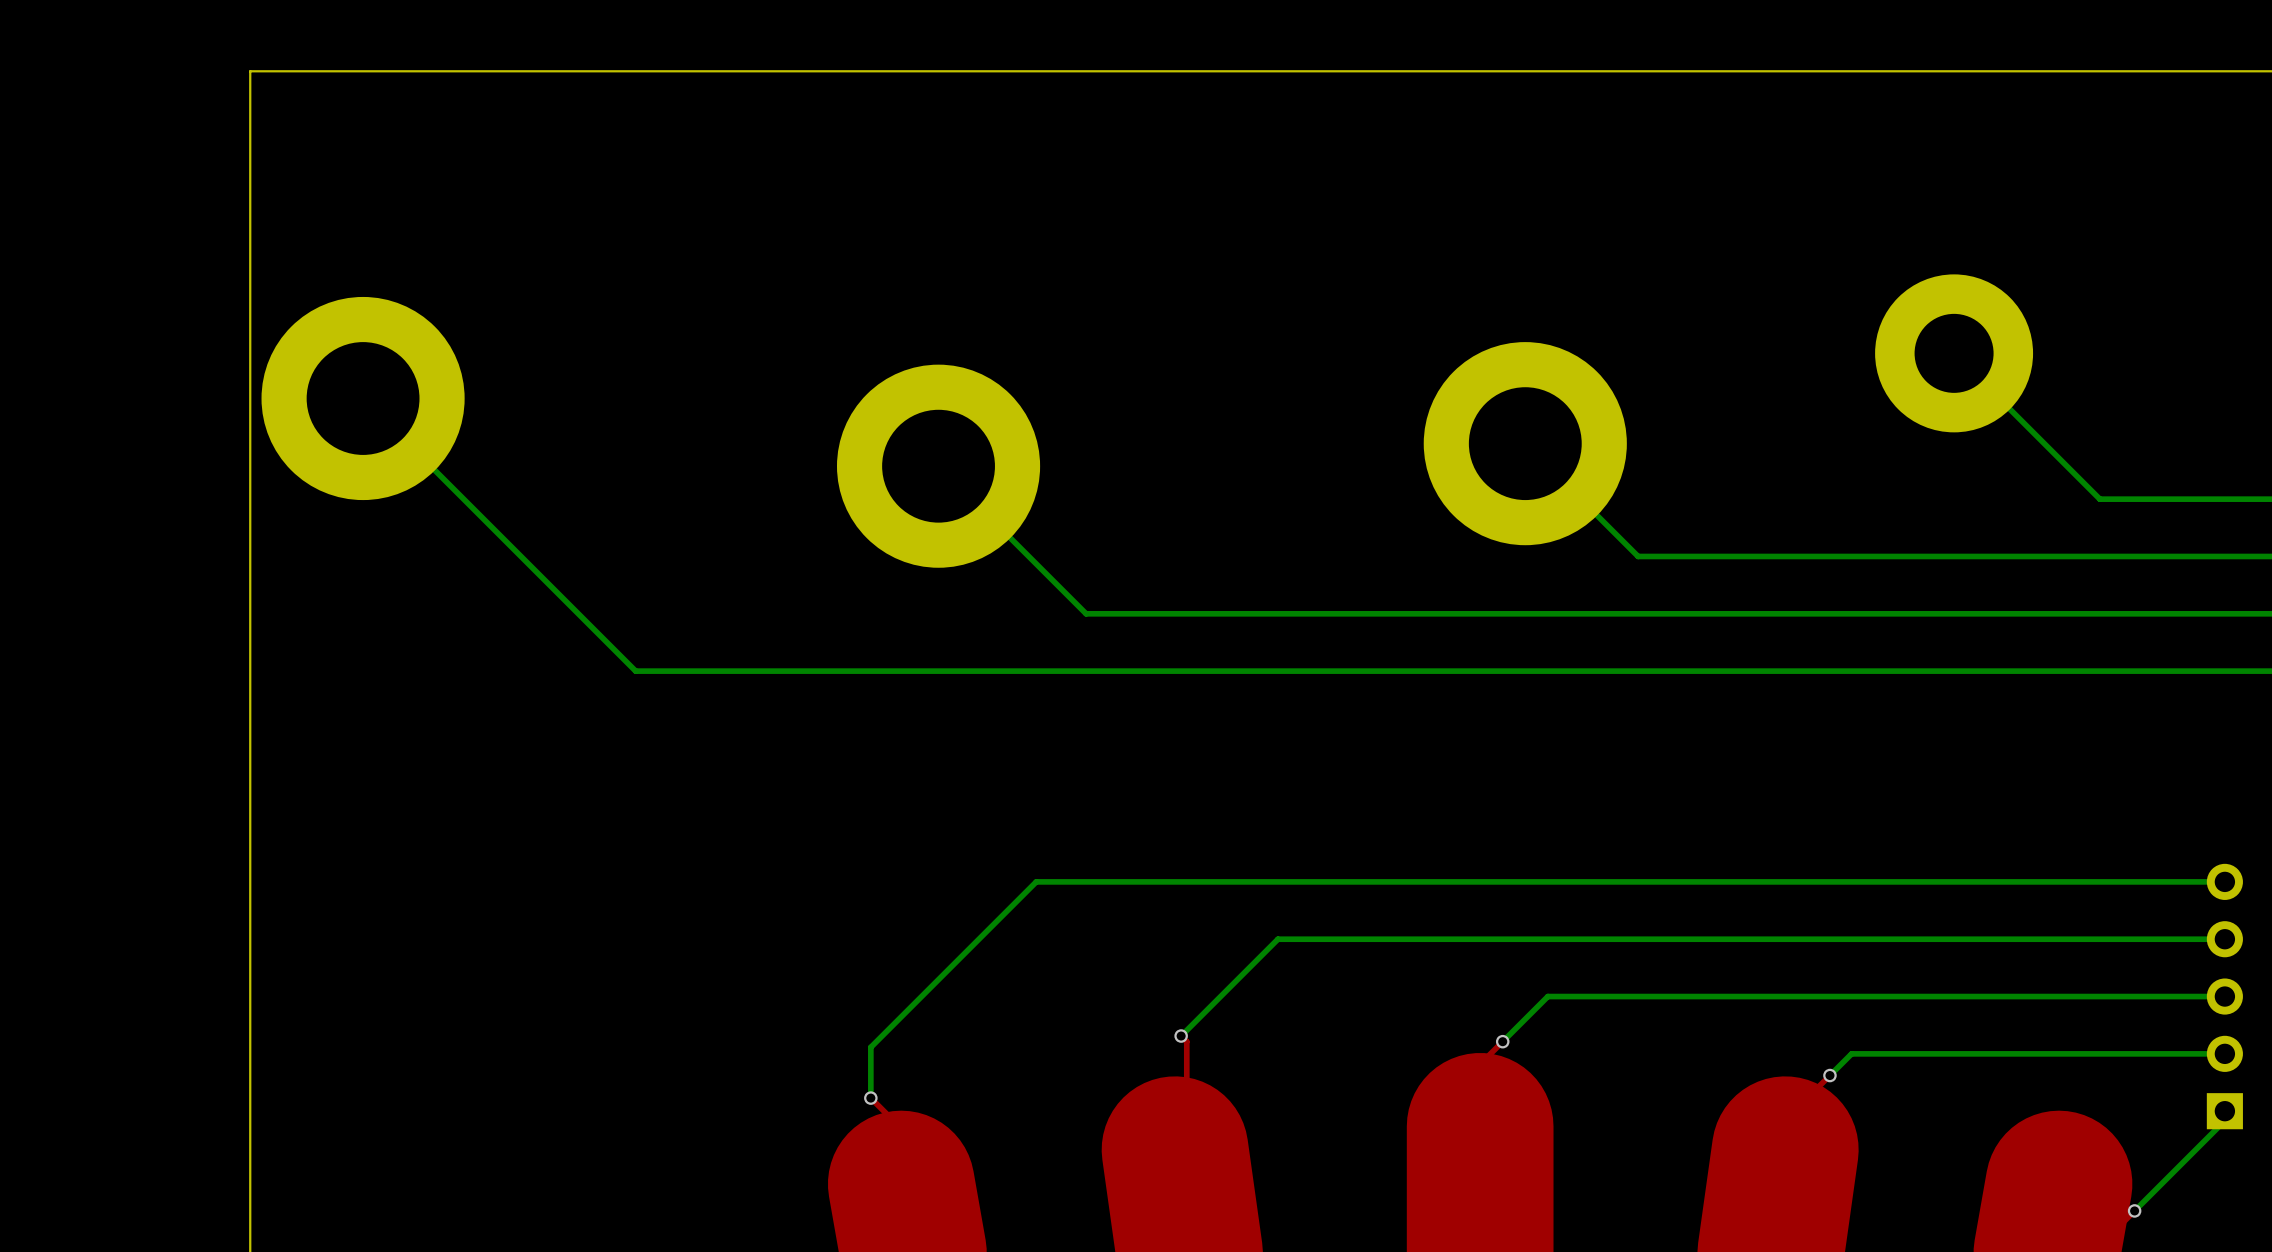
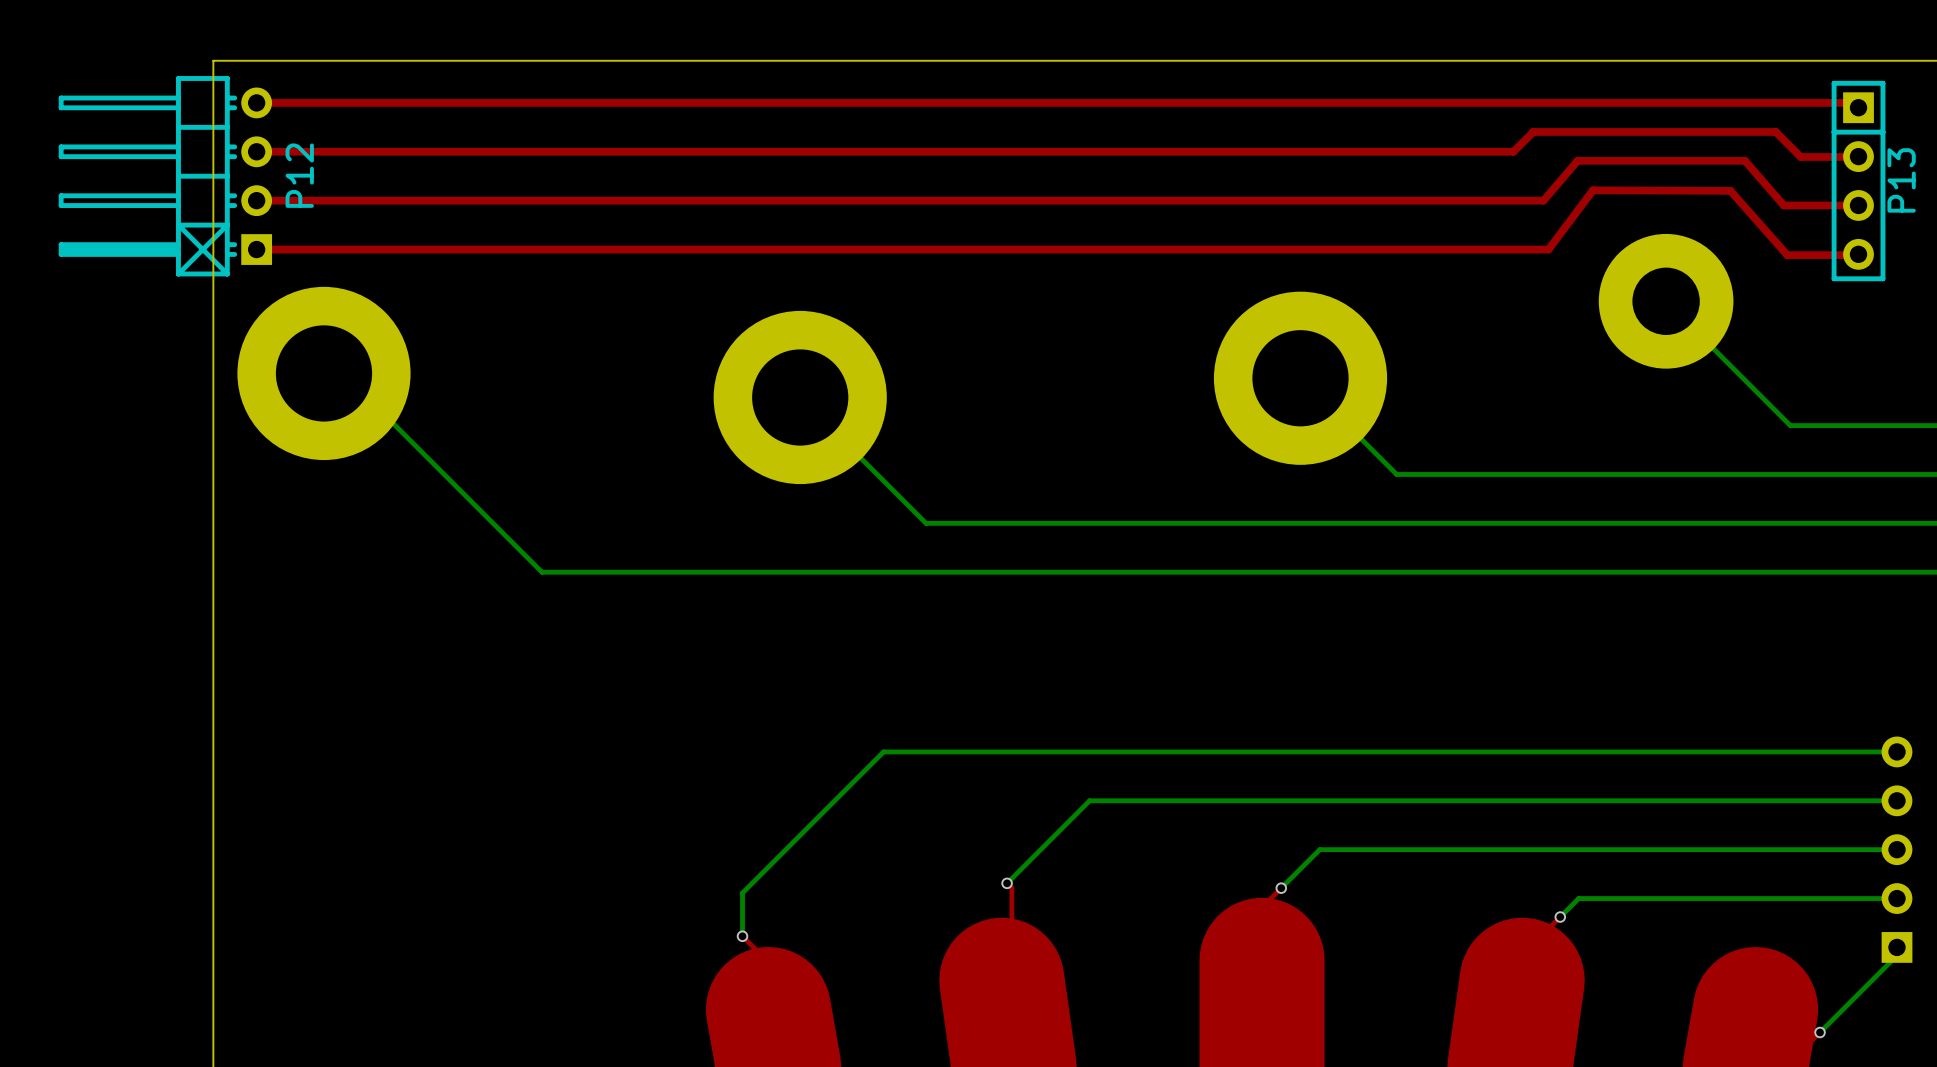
top track: none -> (256, 102) (1853, 102) (1858, 107)
top track: none -> (256, 151) (1513, 151) (1533, 131) (1775, 131) (1800, 156) (1858, 156)
P12: none -> (165, 176)
P13: none -> (1858, 181)
top track: none -> (256, 200) (1543, 200) (1577, 160) (1744, 160) (1783, 205) (1858, 205)
top track: none -> (256, 249) (1548, 249) (1592, 190) (1730, 190) (1787, 255) (1858, 254)
part position: (363, 398) -> (324, 373)

